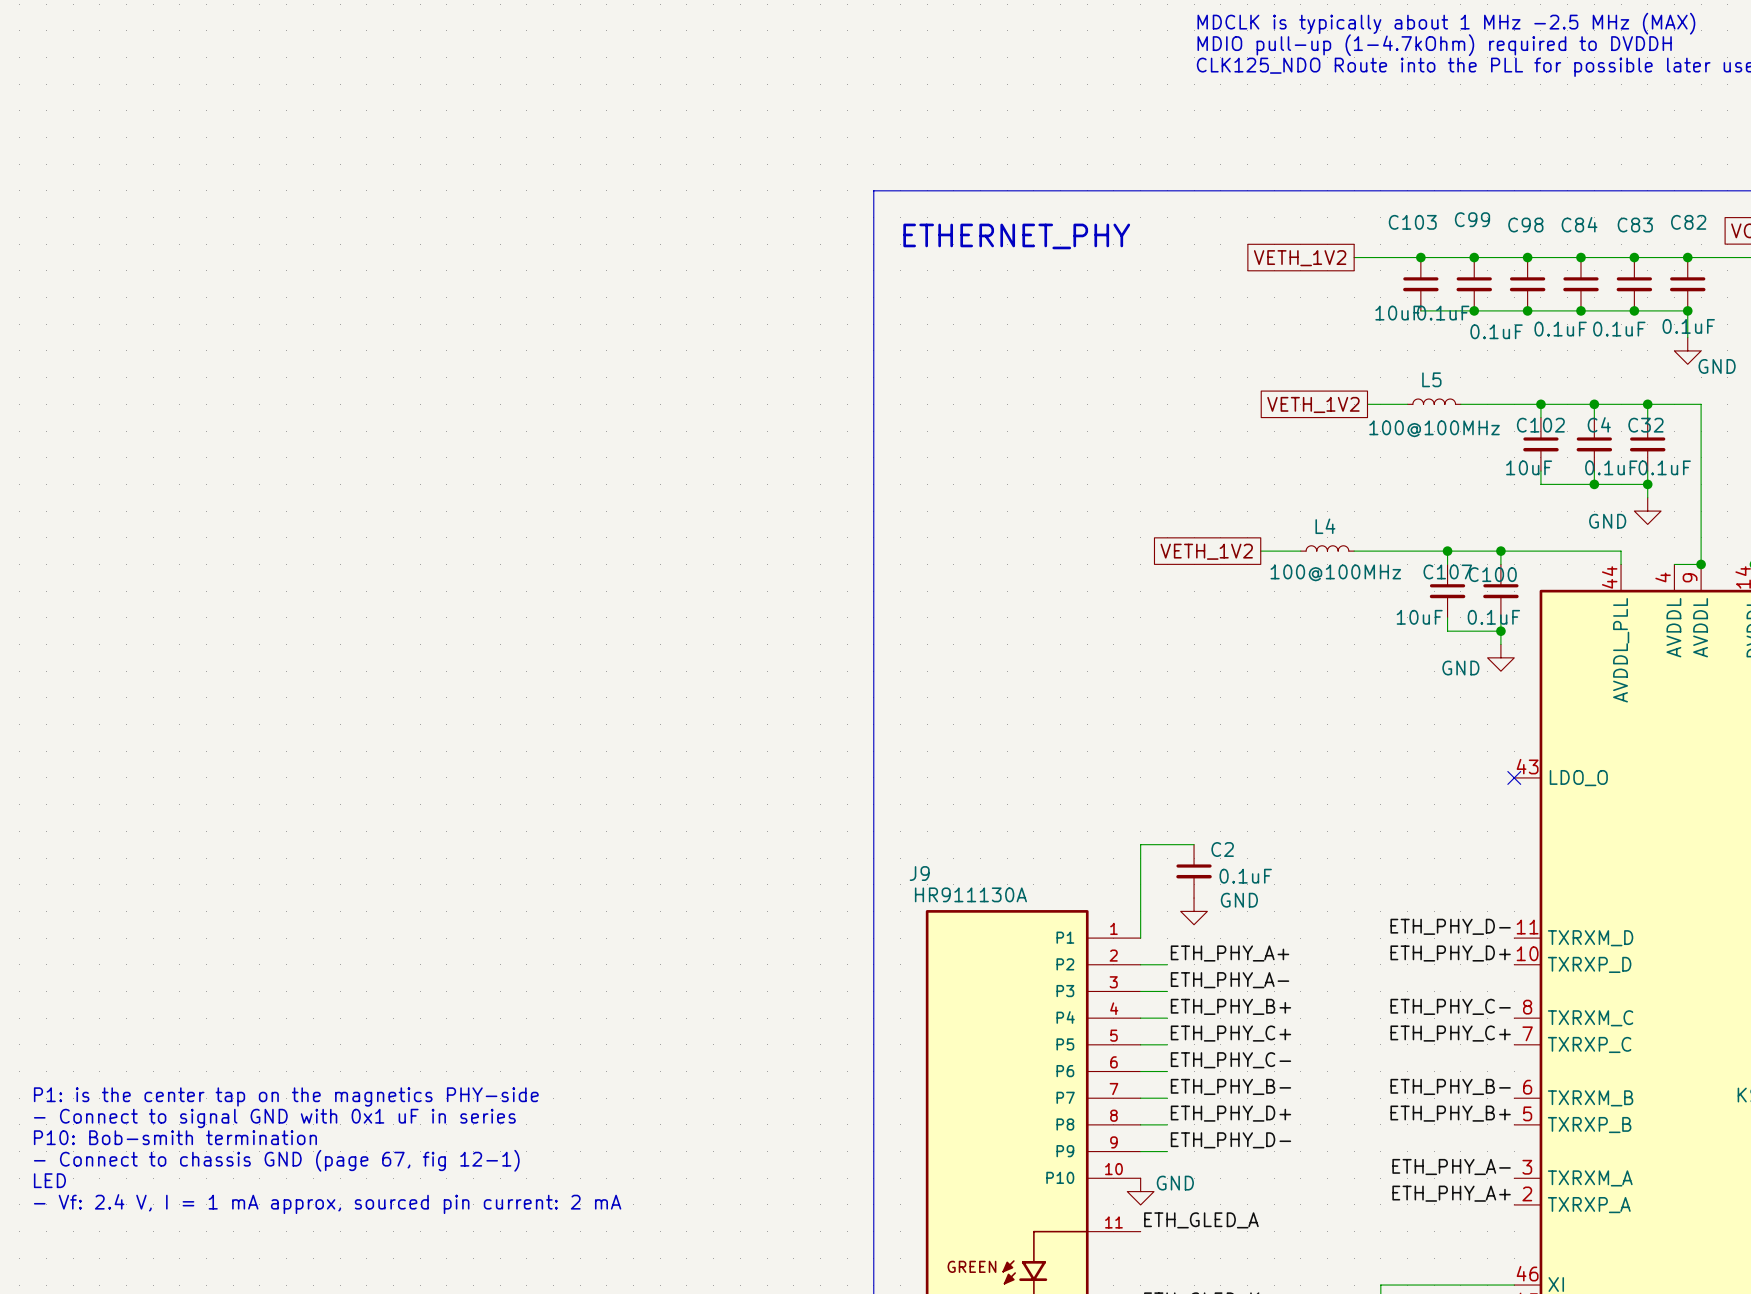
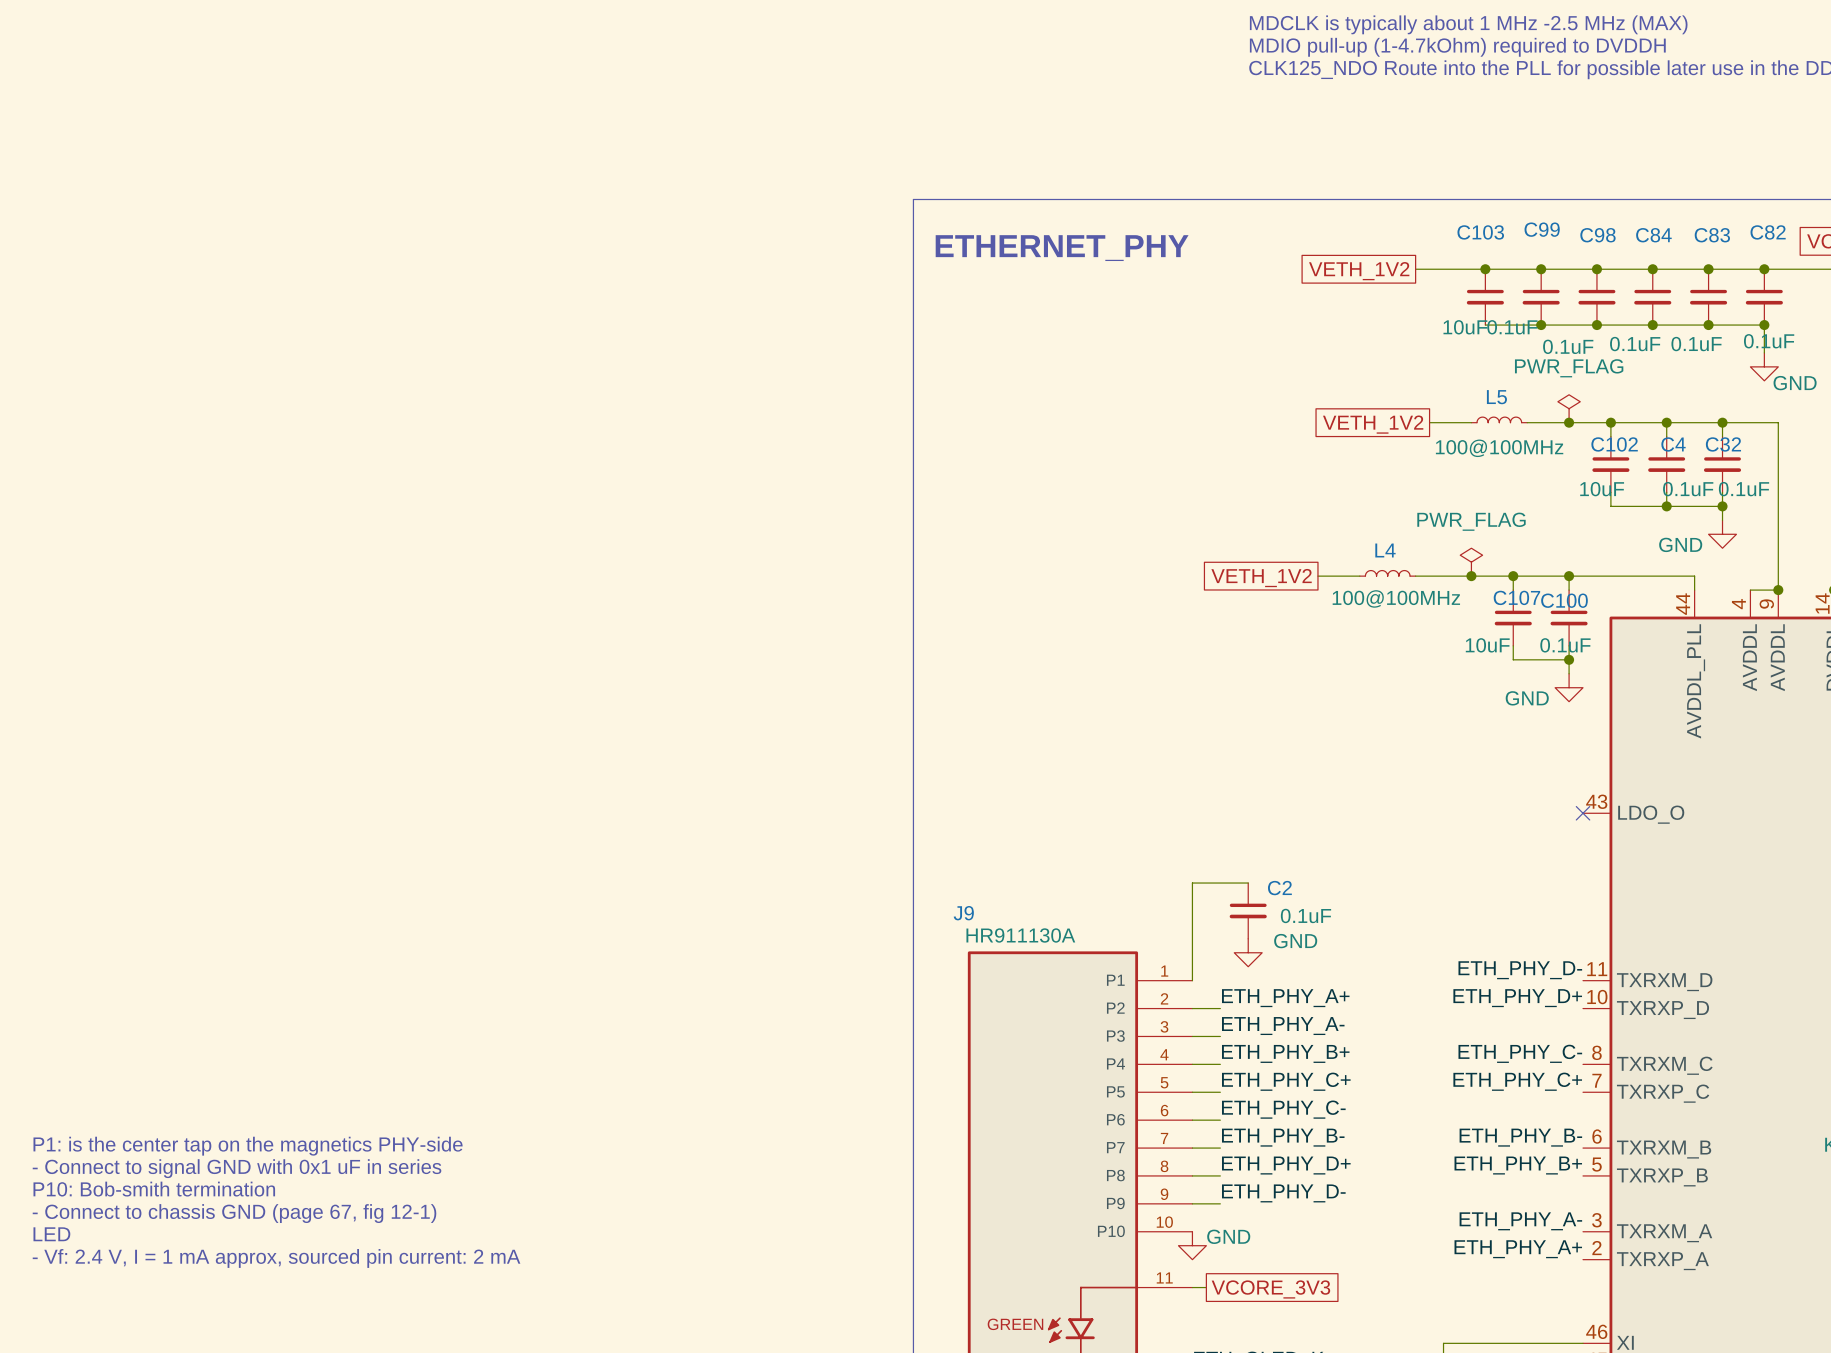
power symbol: none -> PWR_FLAG (1569, 408)
junction: none -> (1569, 422)
power symbol: none -> PWR_FLAG (1471, 562)
junction: none -> (1471, 576)
label: ETH_GLED_A (1201, 1220) -> none
wire: none -> (1192, 1287) (1206, 1287)
global label: none -> VCORE_3V3 (1270, 1289)

